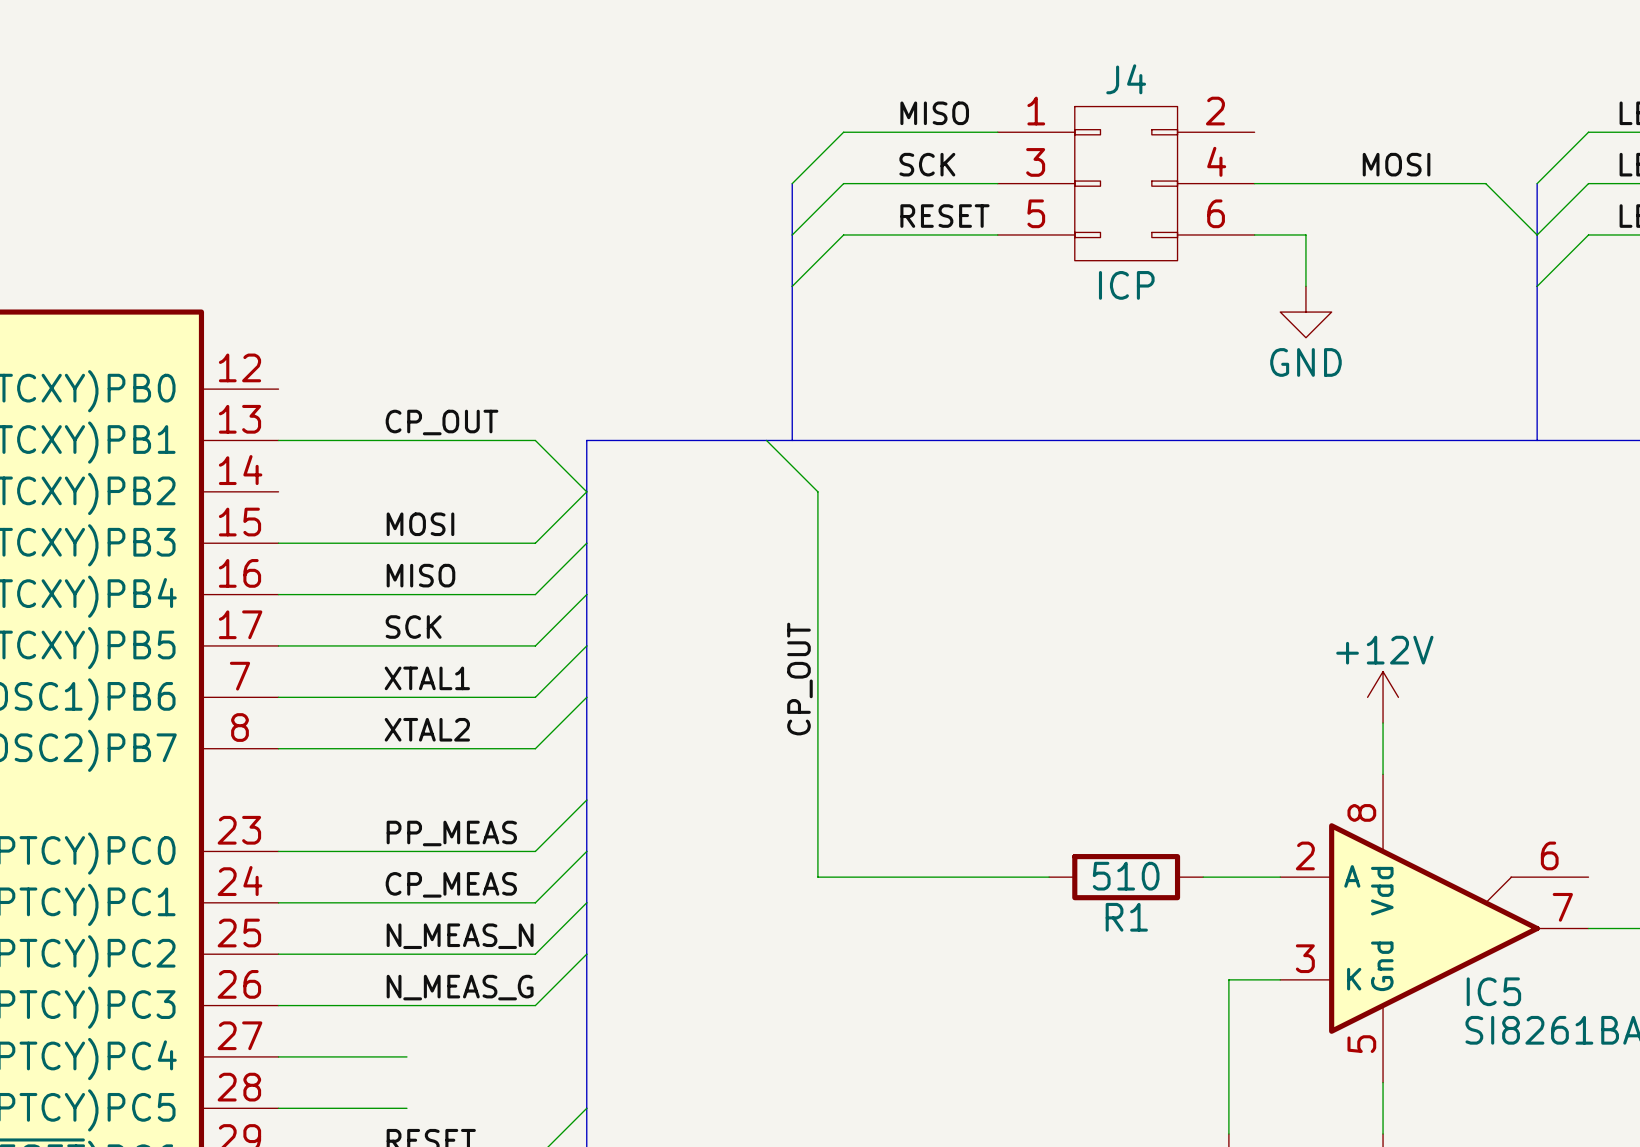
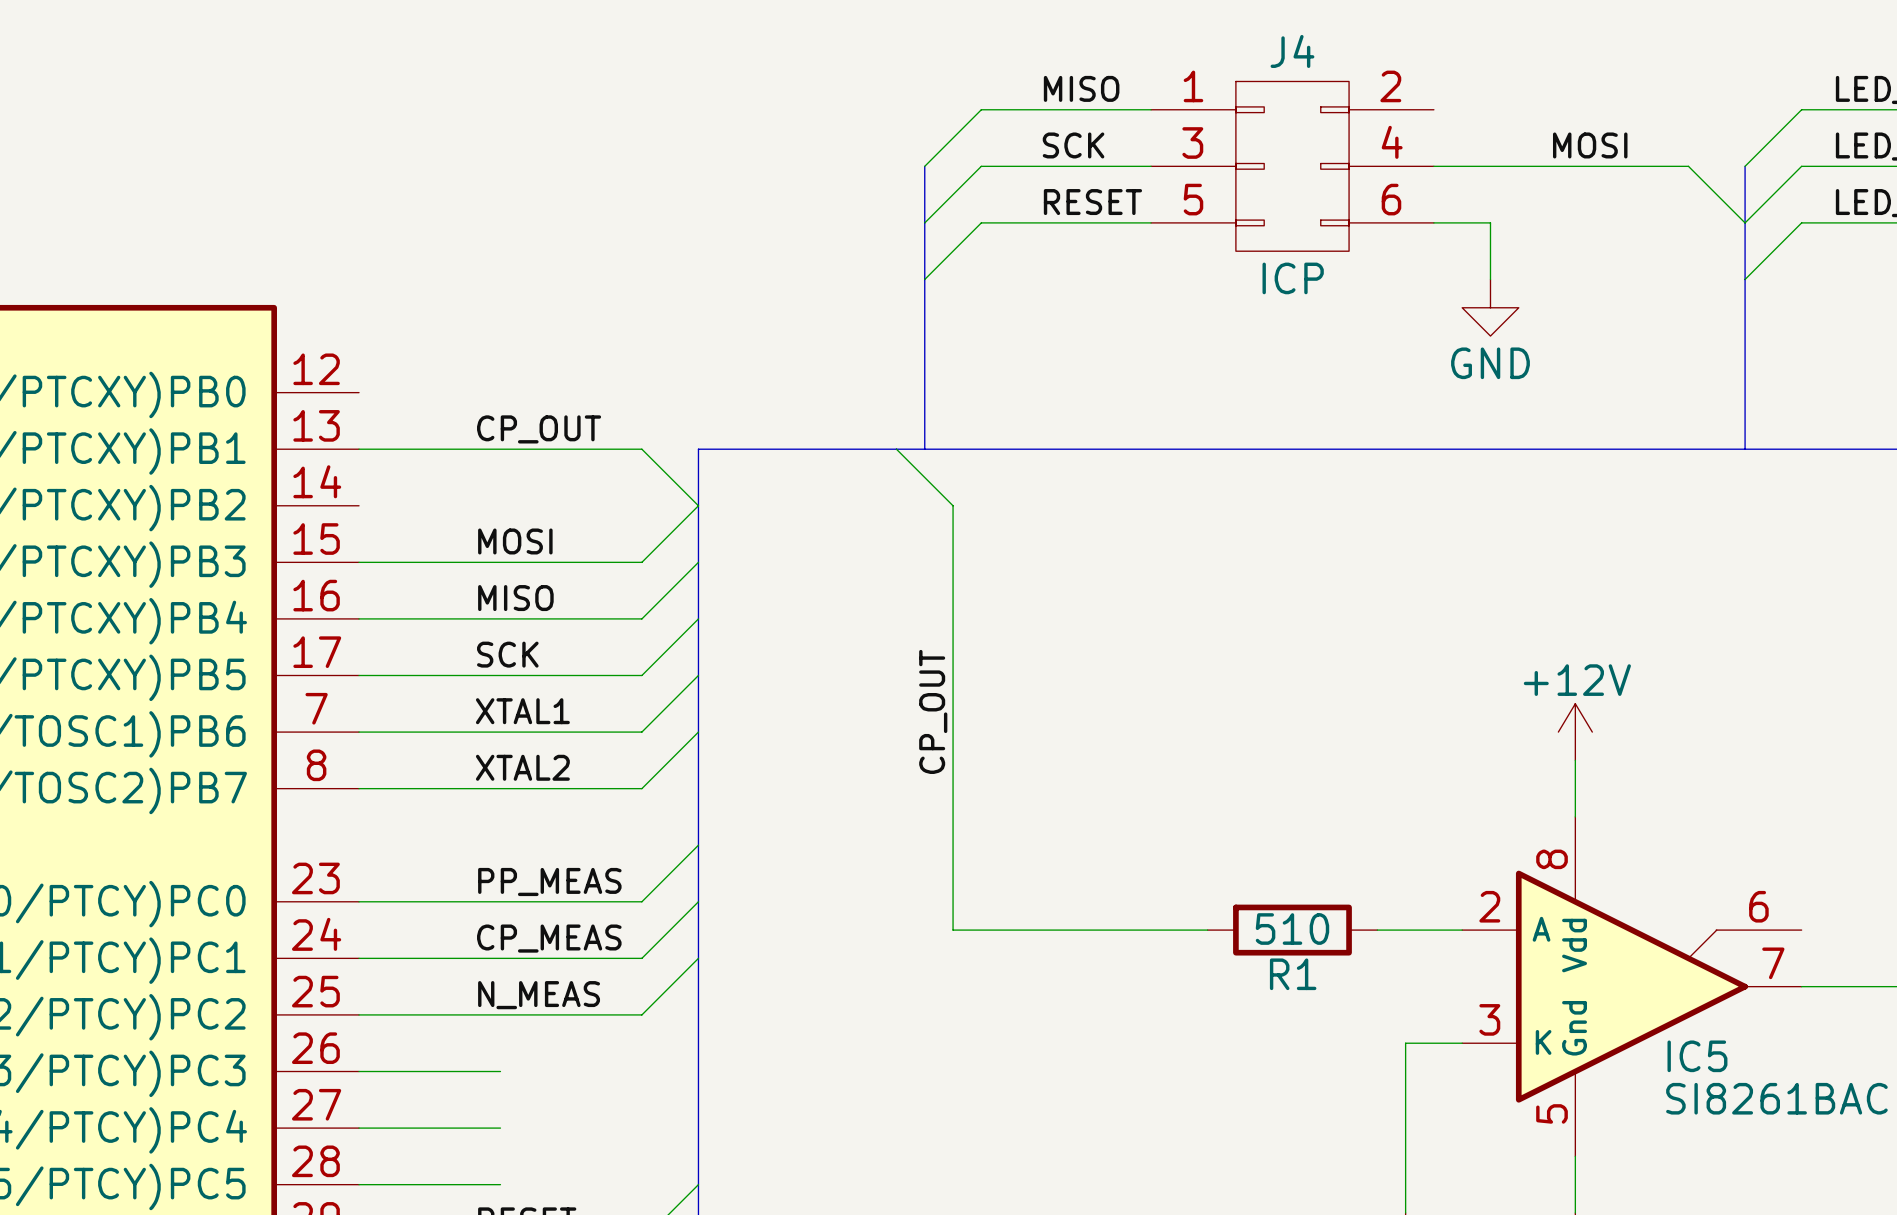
label: N_MEAS_N (460, 936) -> N_MEAS (539, 995)
wire: (586, 954) (535, 1005) (406, 1005) -> none
label: N_MEAS_G (460, 987) -> none

